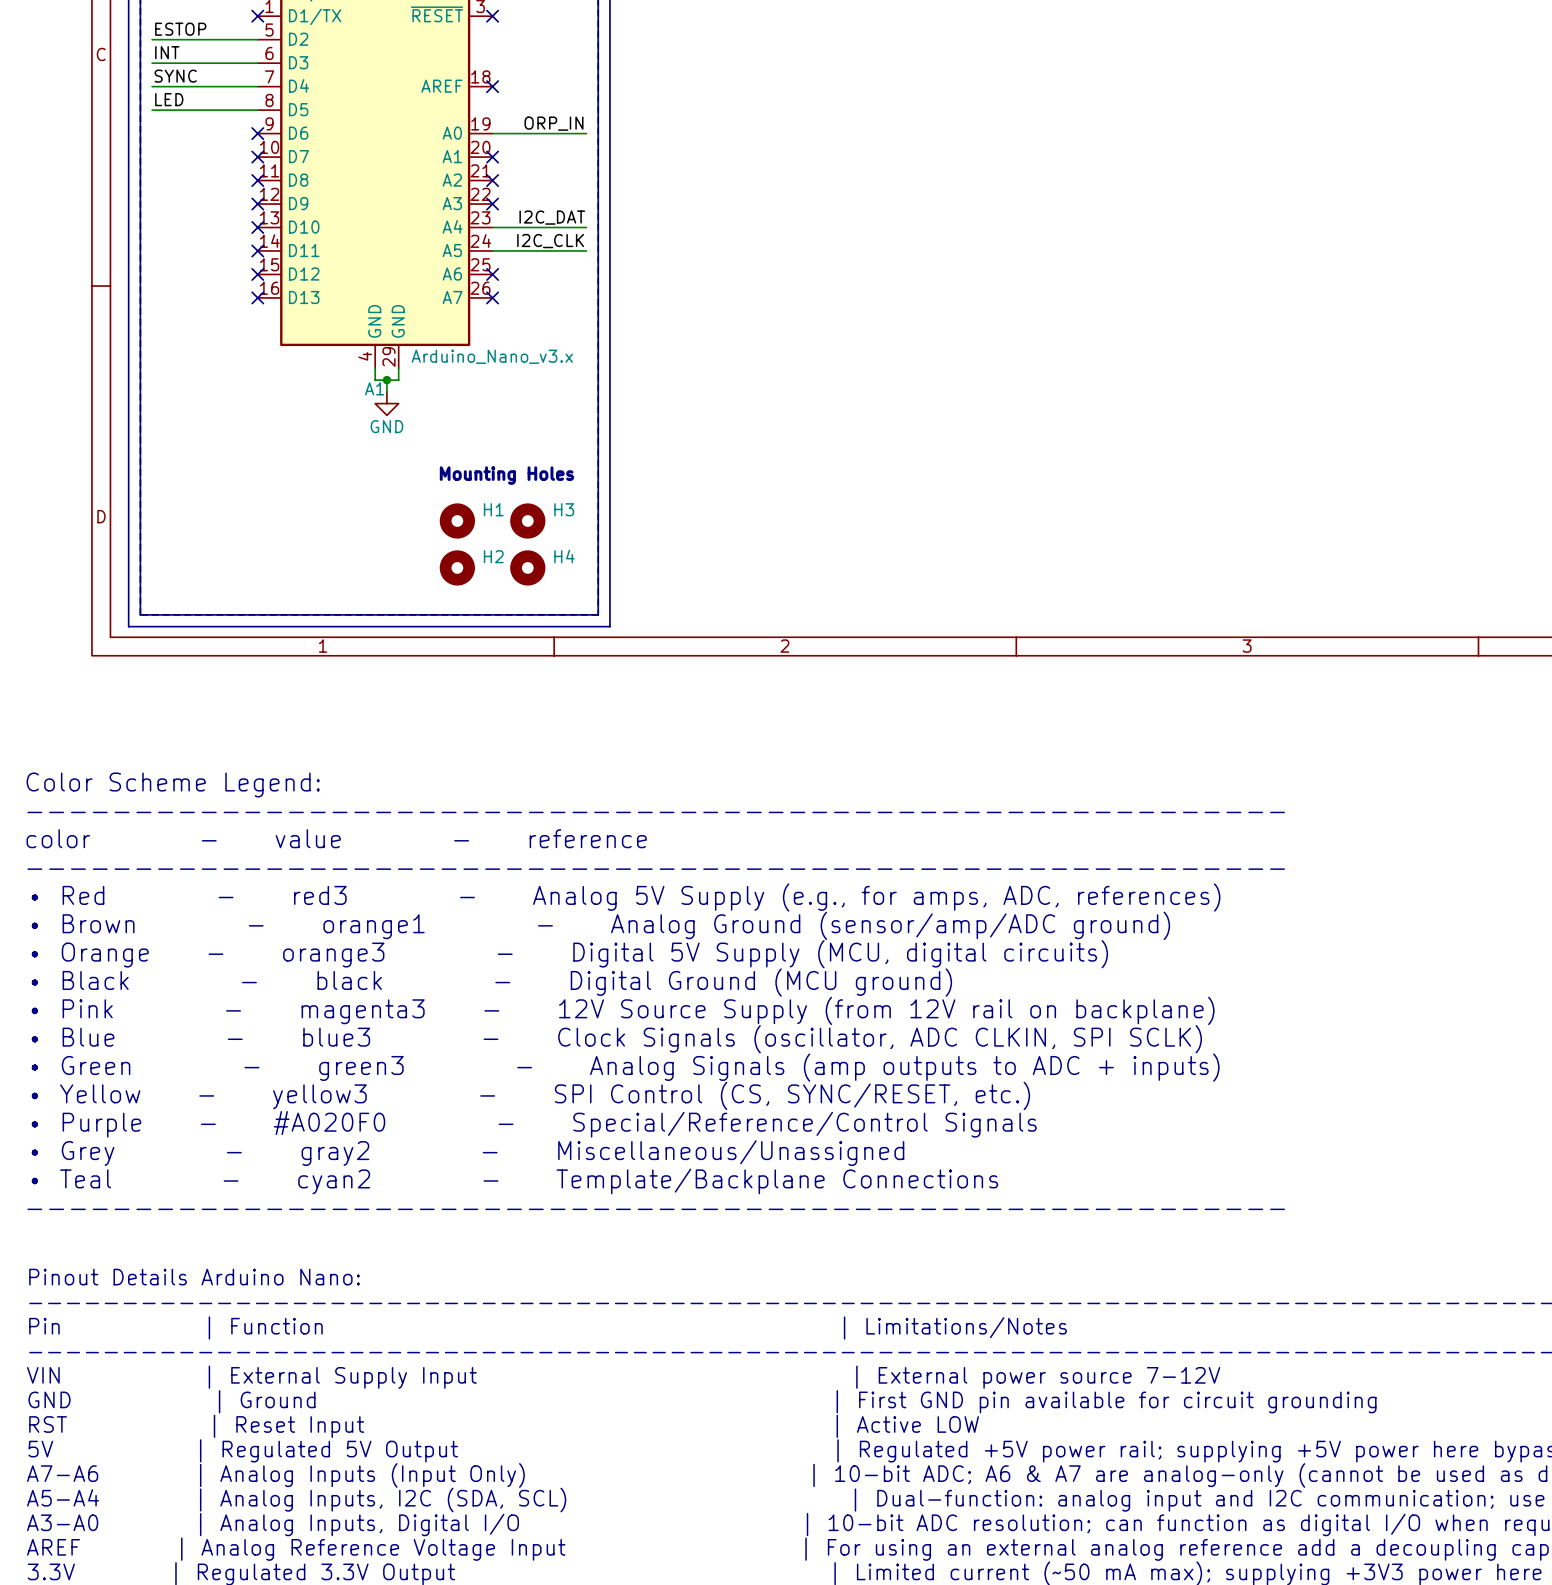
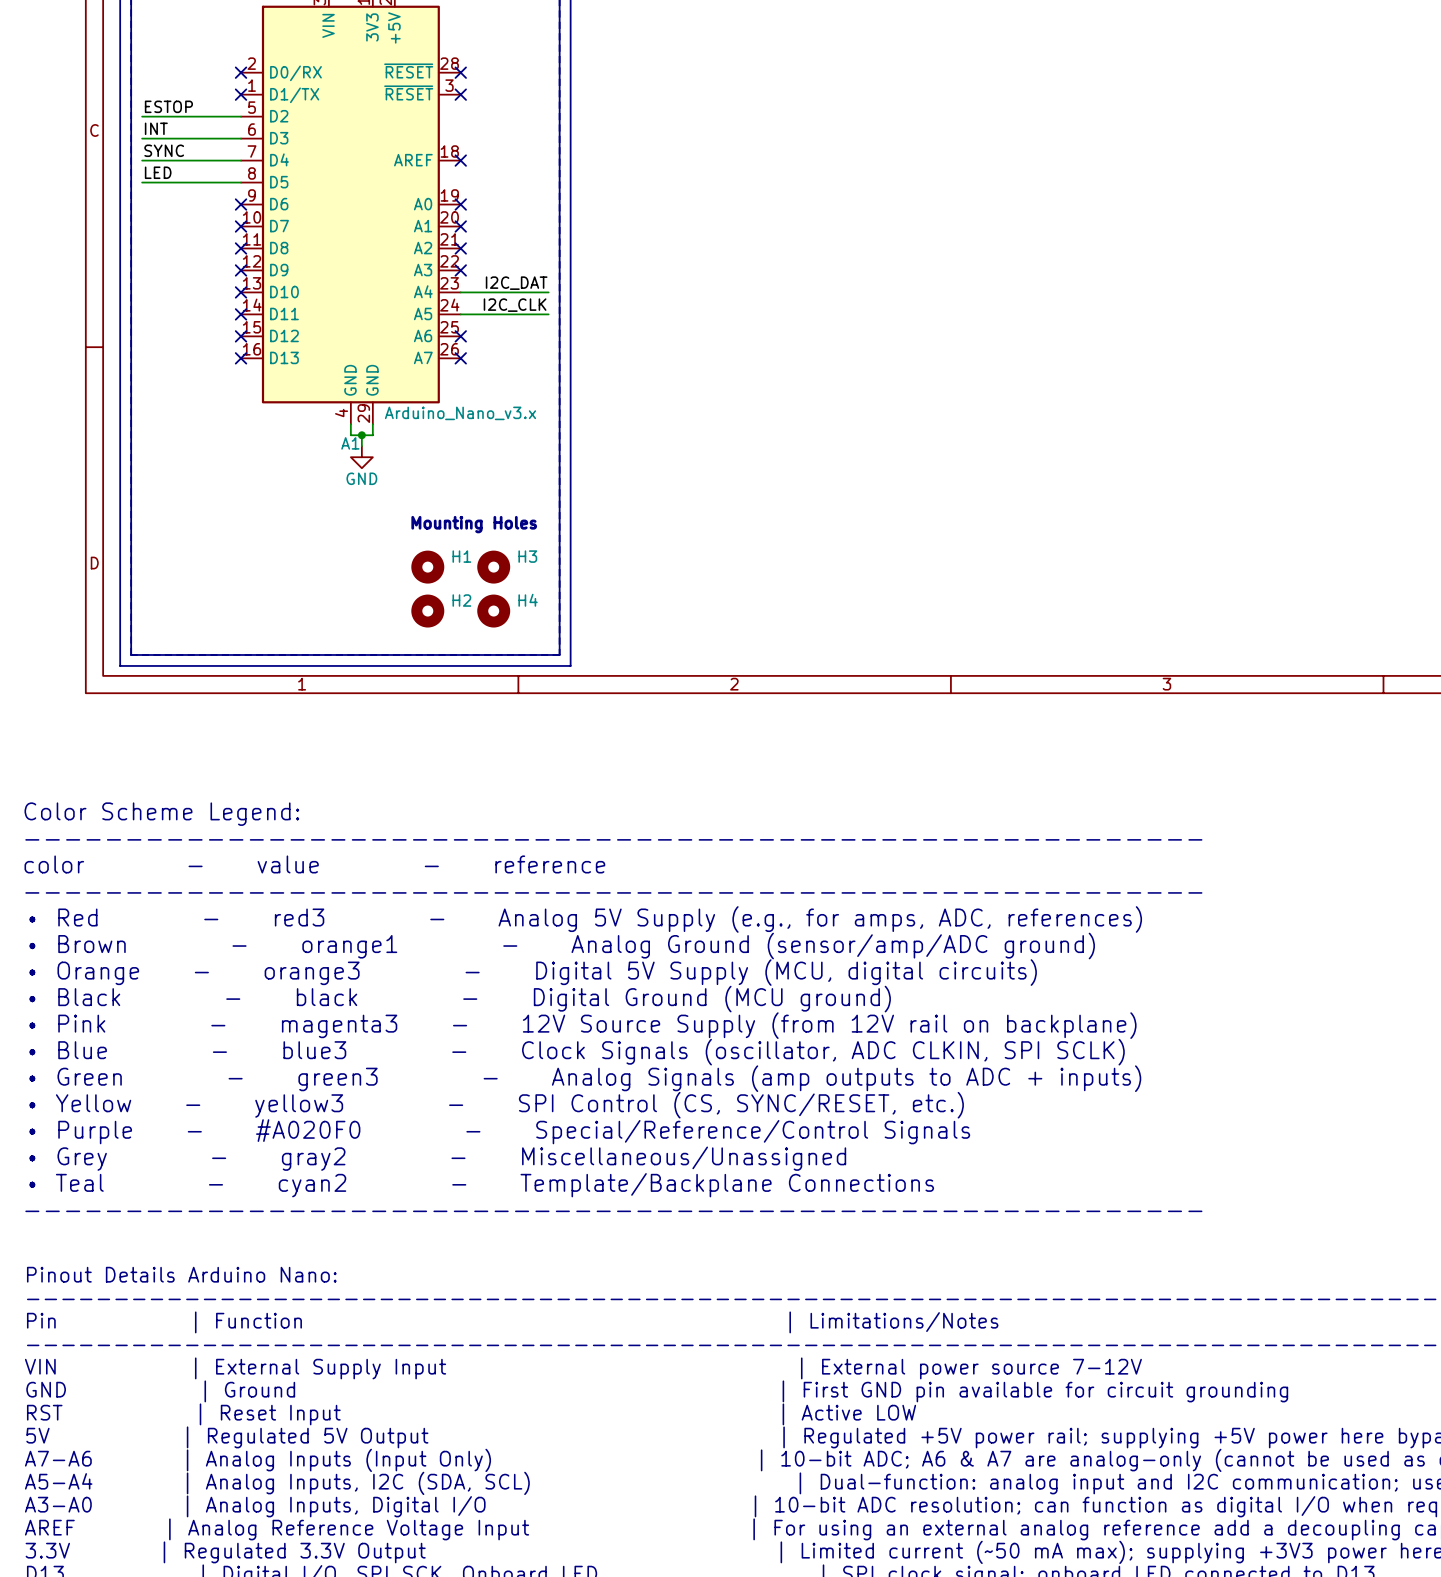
label: ORP_IN (553, 123) -> none
wire: (492, 133) (586, 133) -> none
no-connect mark: none -> (460, 204)

